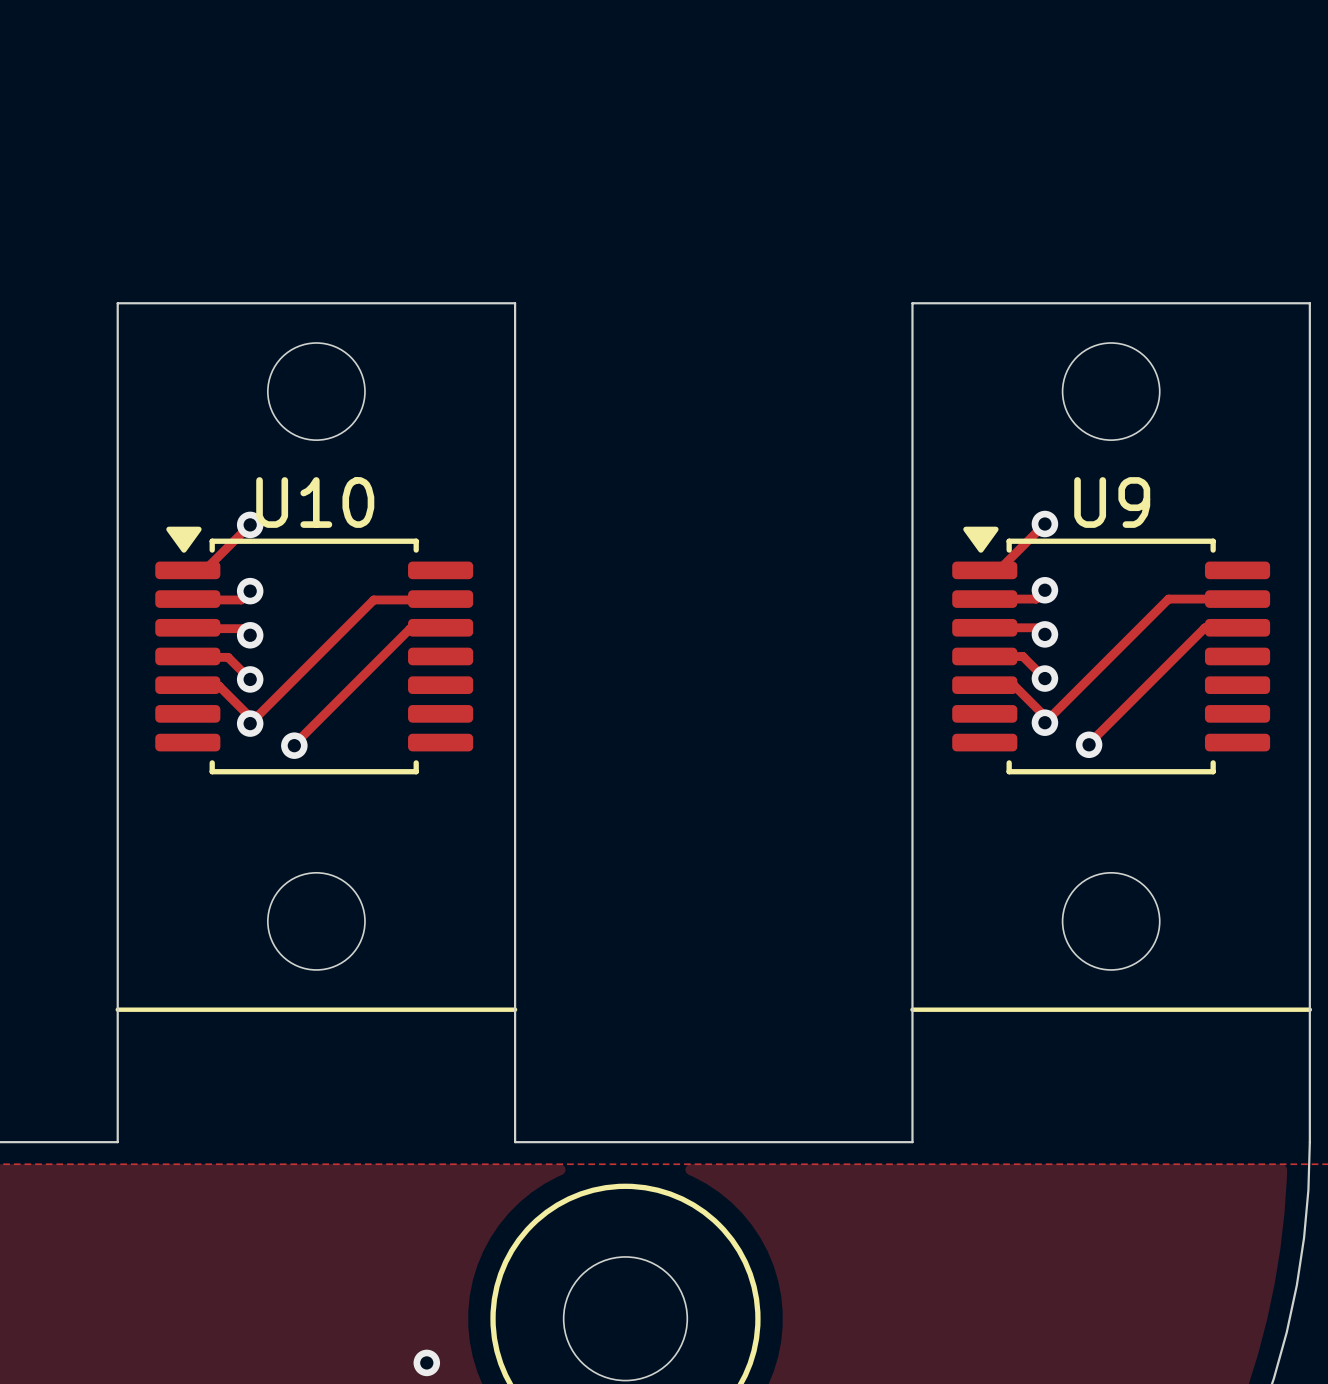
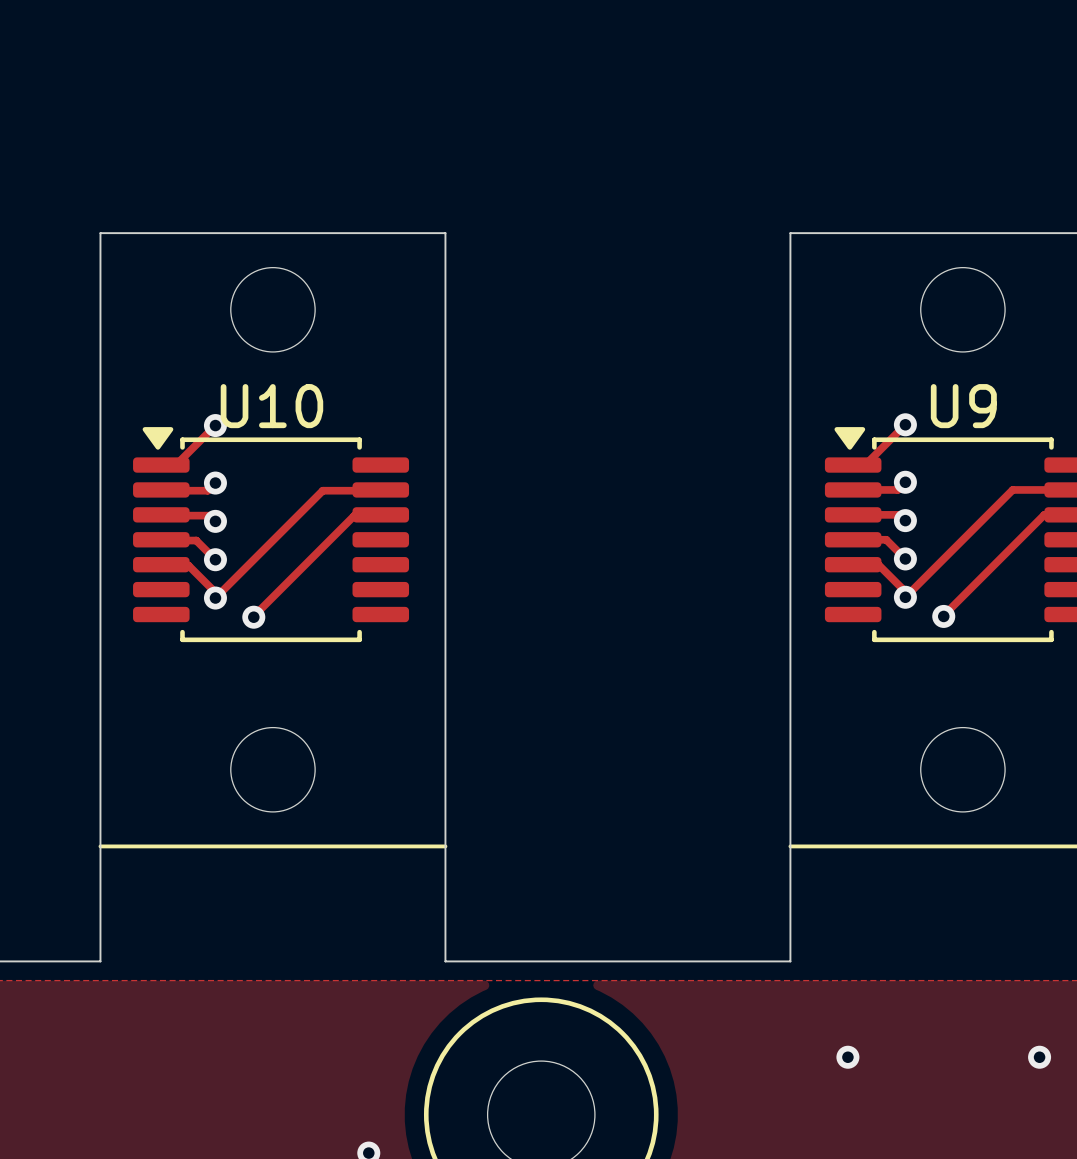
via: none -> (847, 1057)
via: none -> (1039, 1057)

